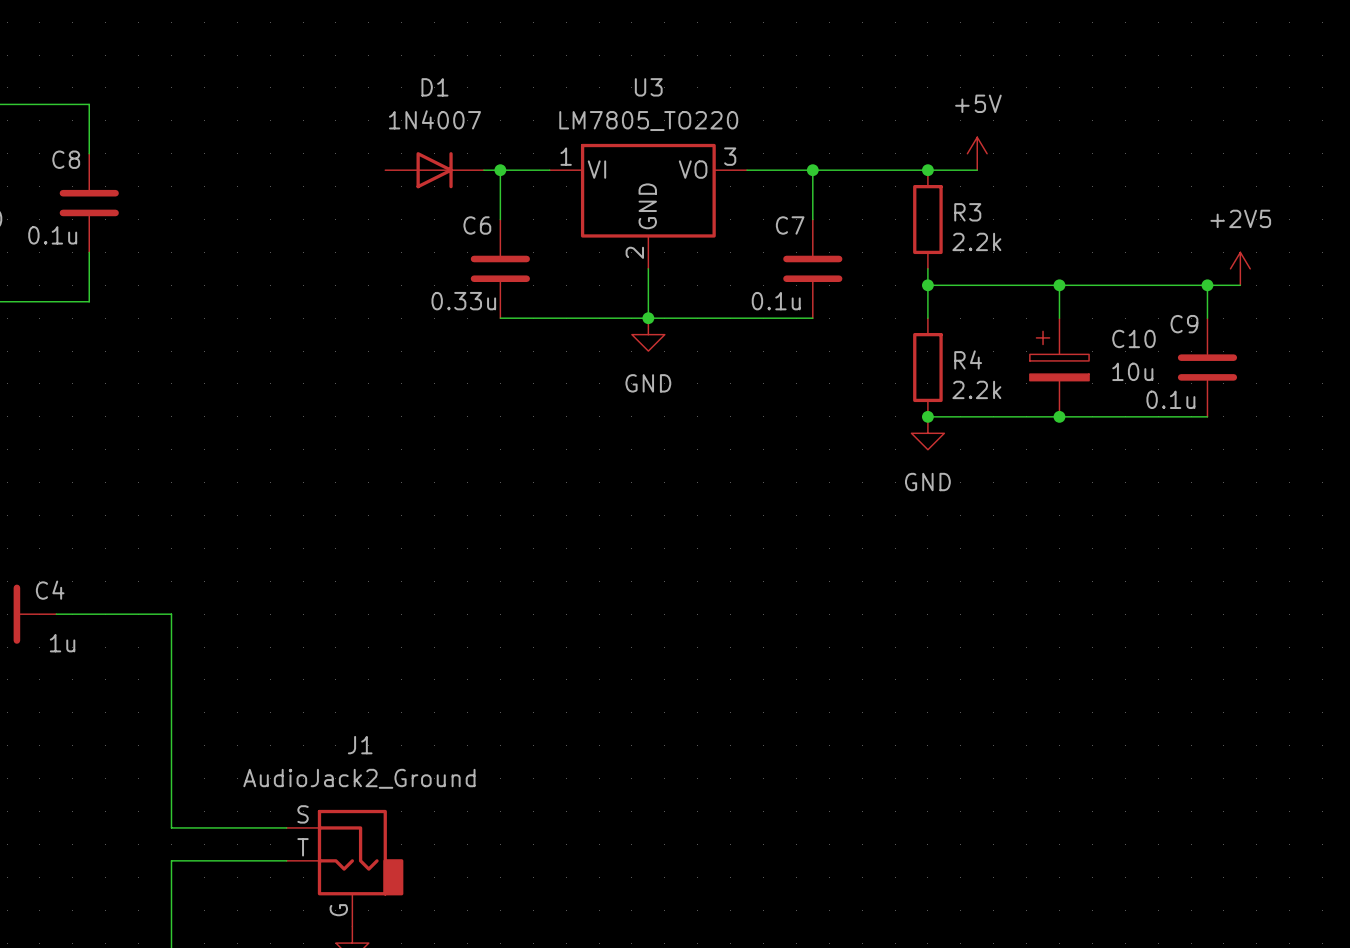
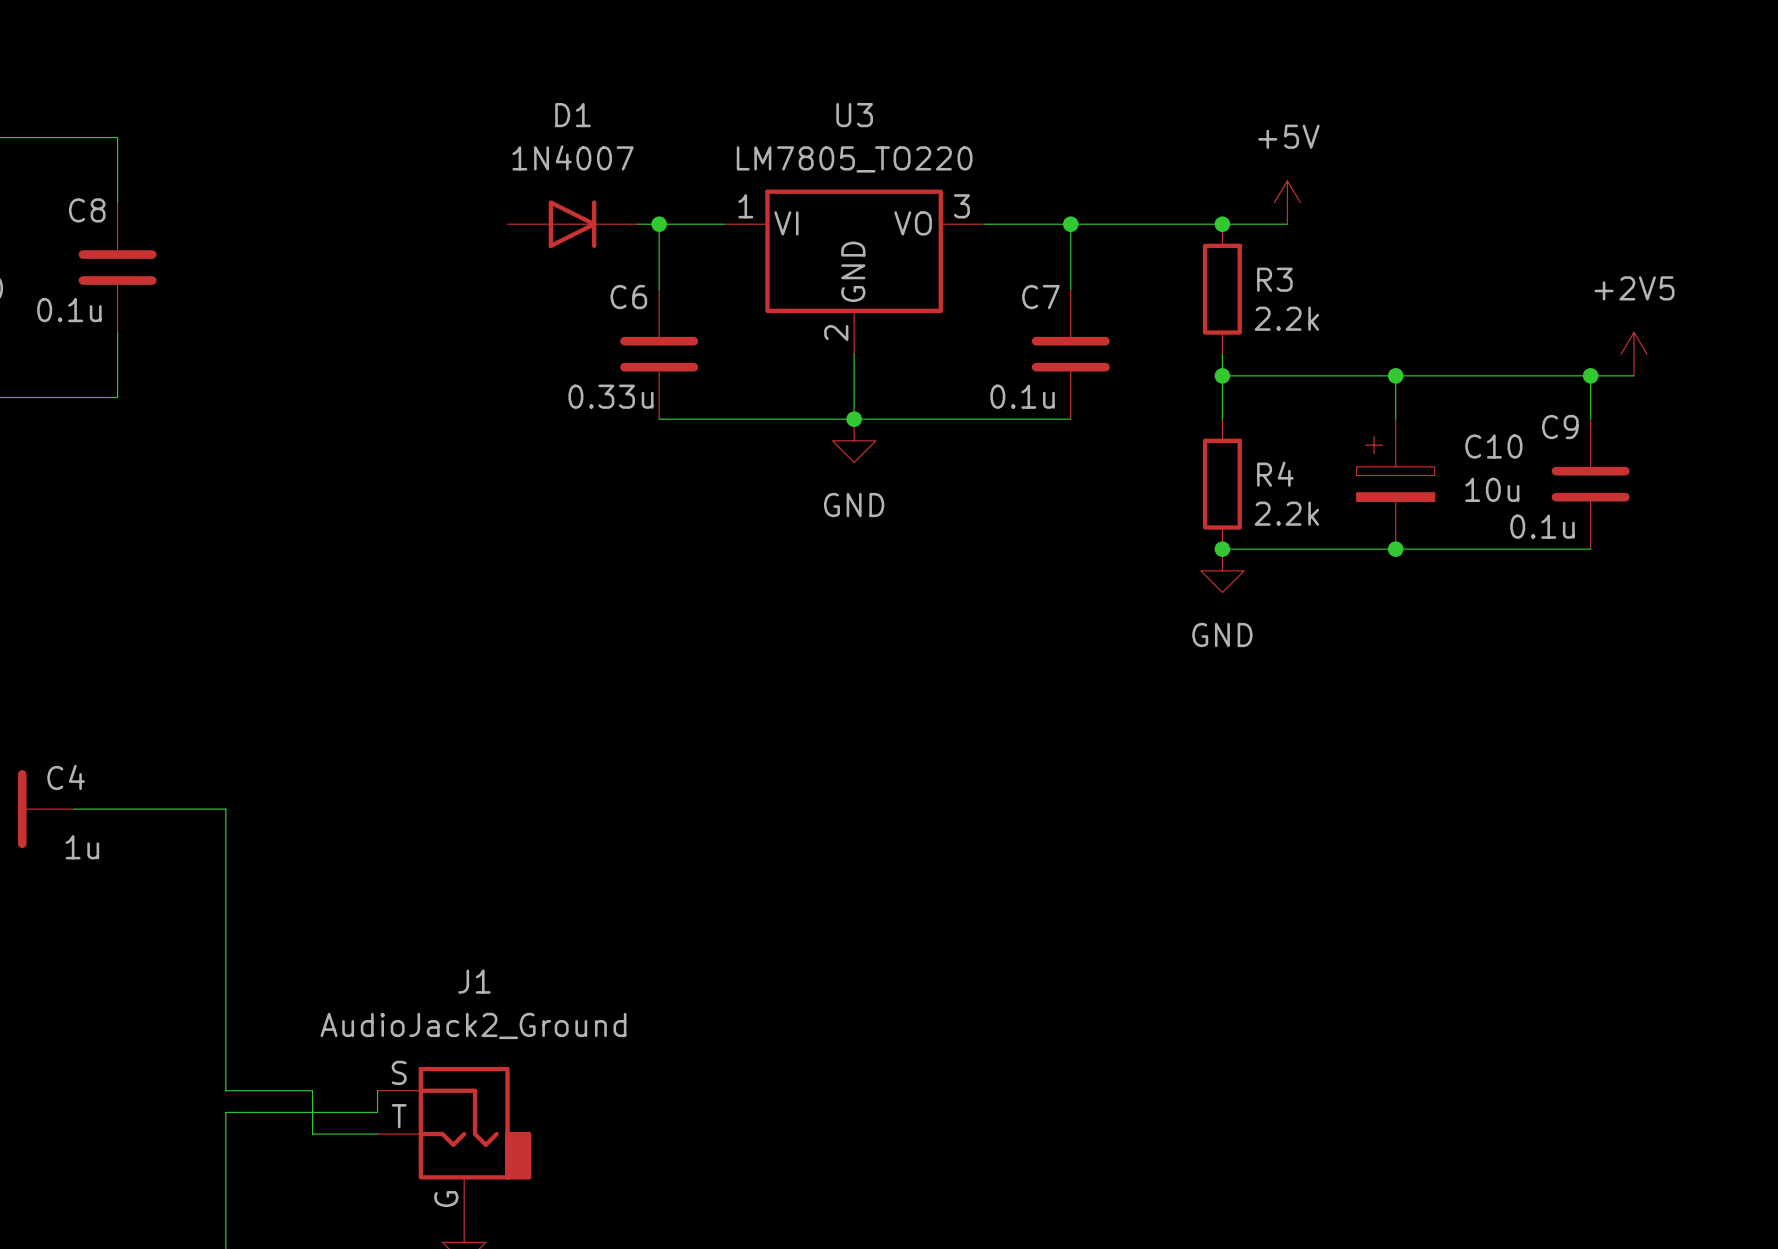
wire: (237, 827) (286, 827) -> (312, 1090) (312, 1134)
wire: (171, 860) (237, 860) -> (225, 1134) (225, 1112) (377, 1112) (377, 1090)

